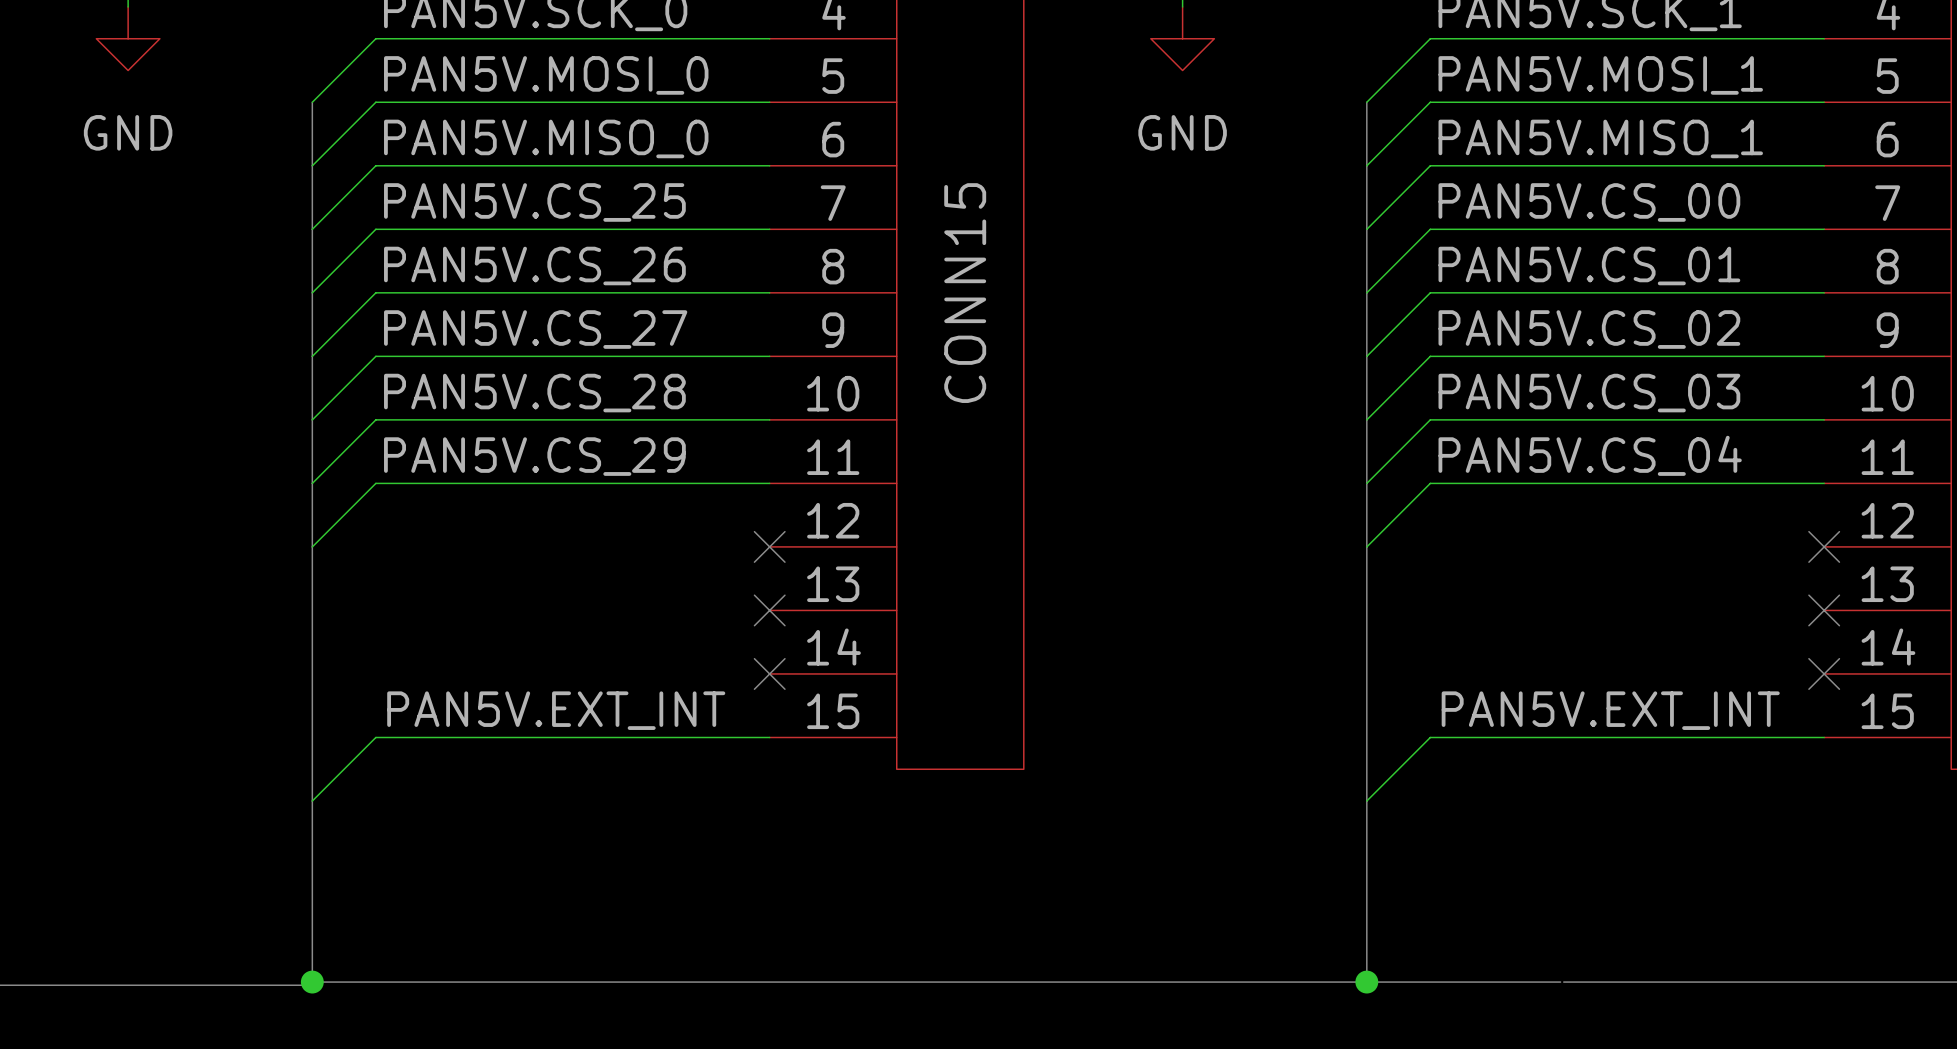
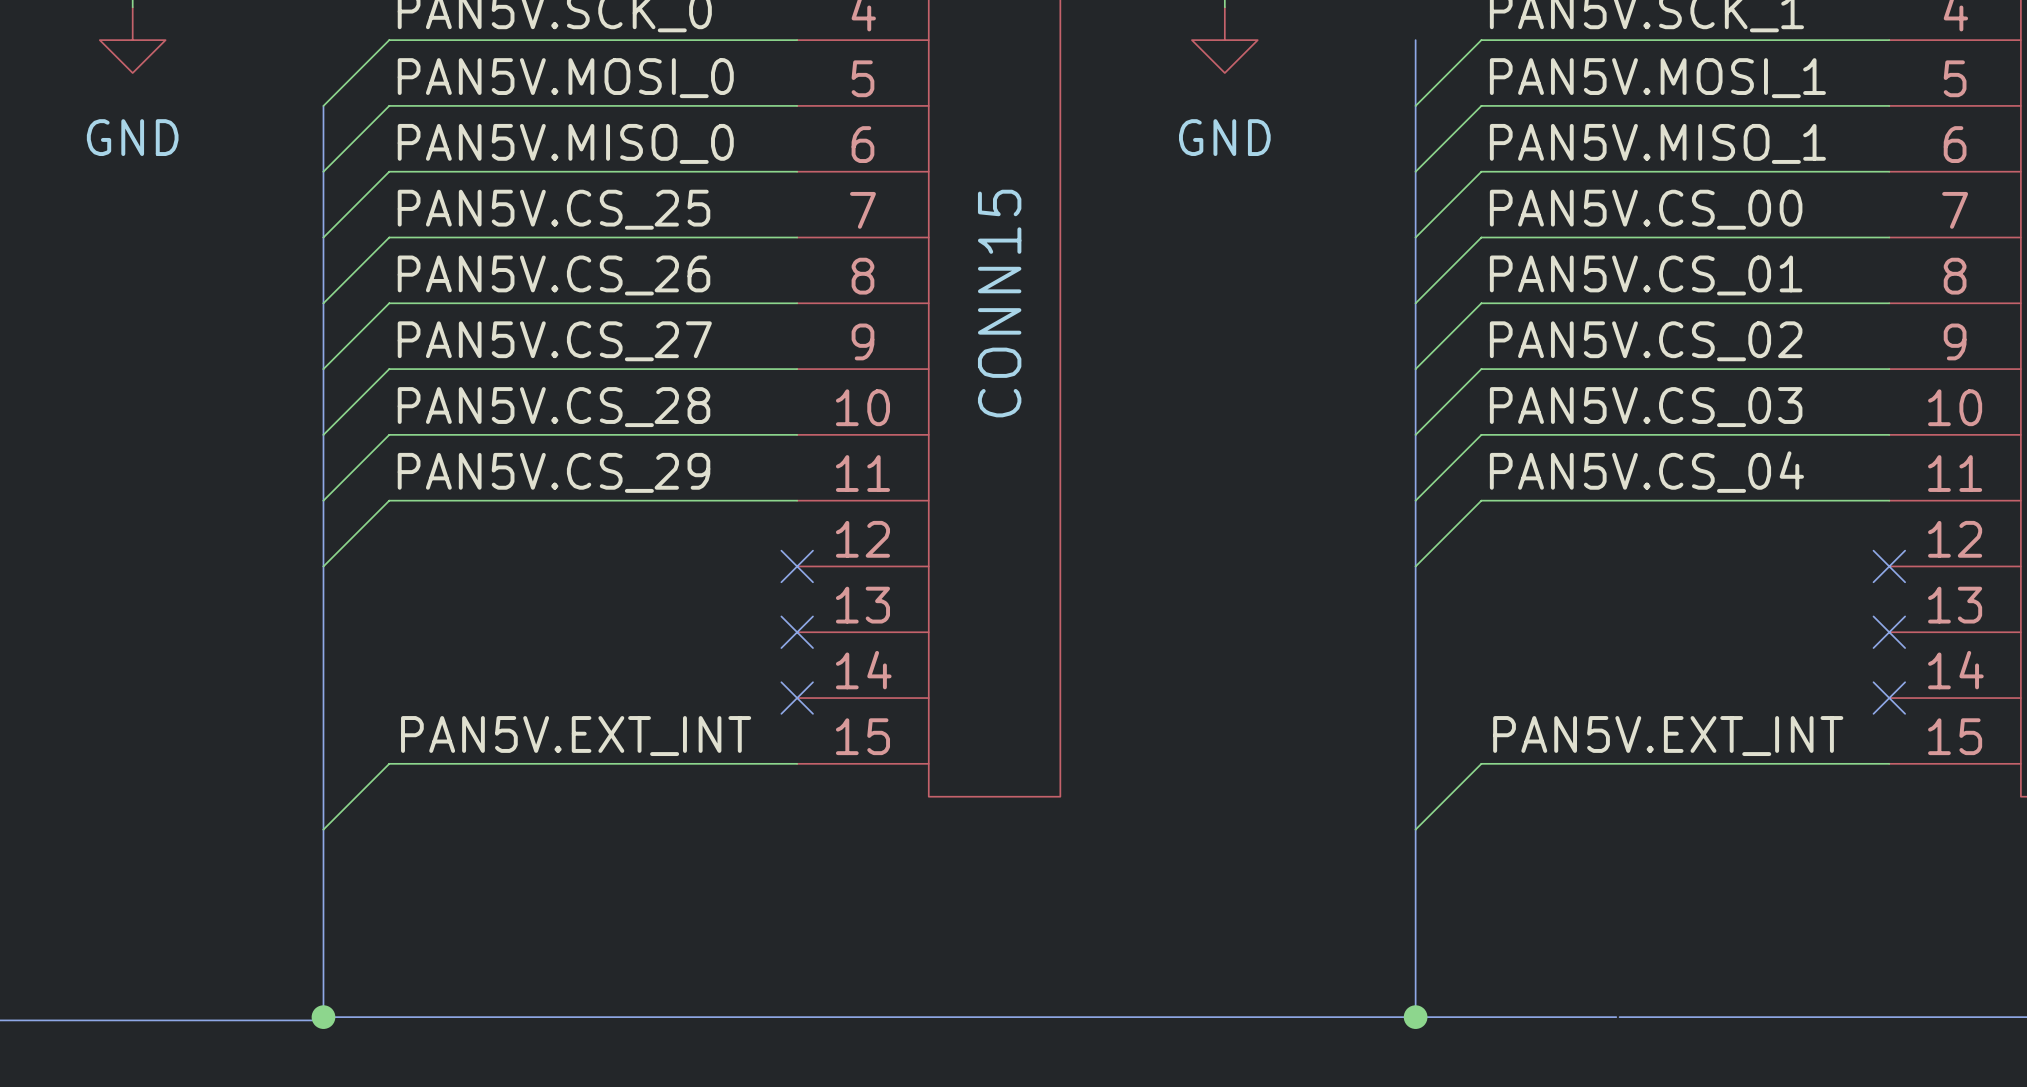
bus: none -> (1415, 40) (1415, 105)

